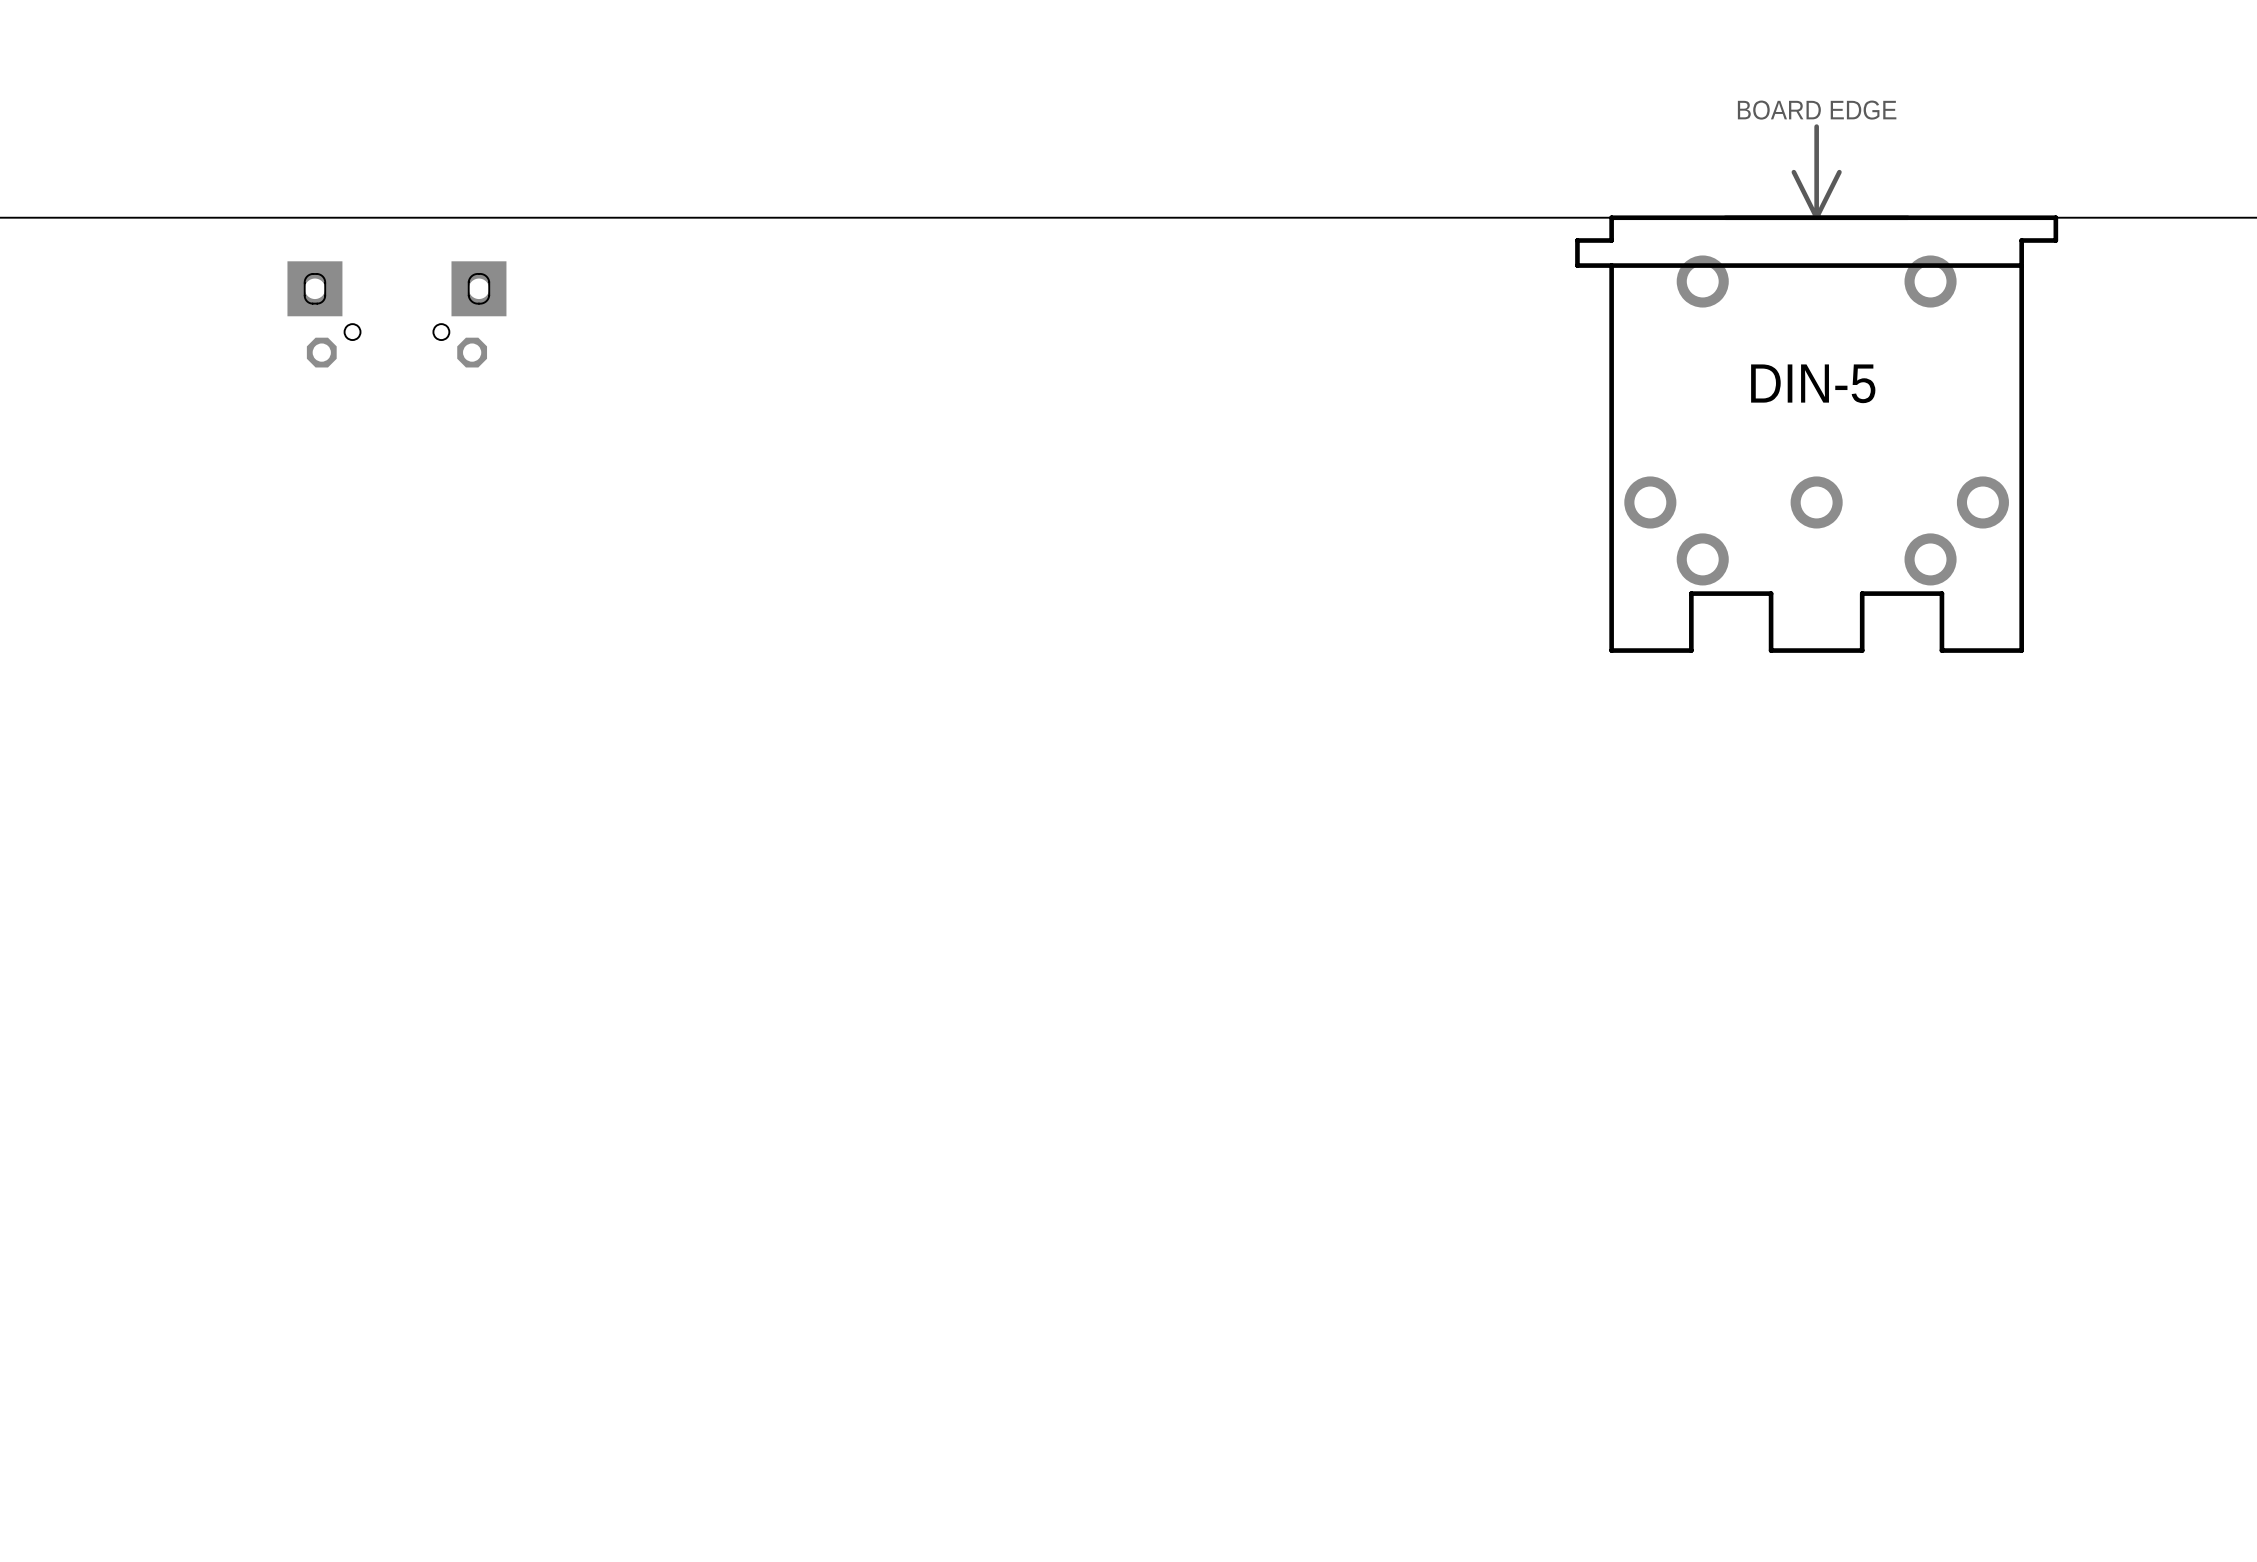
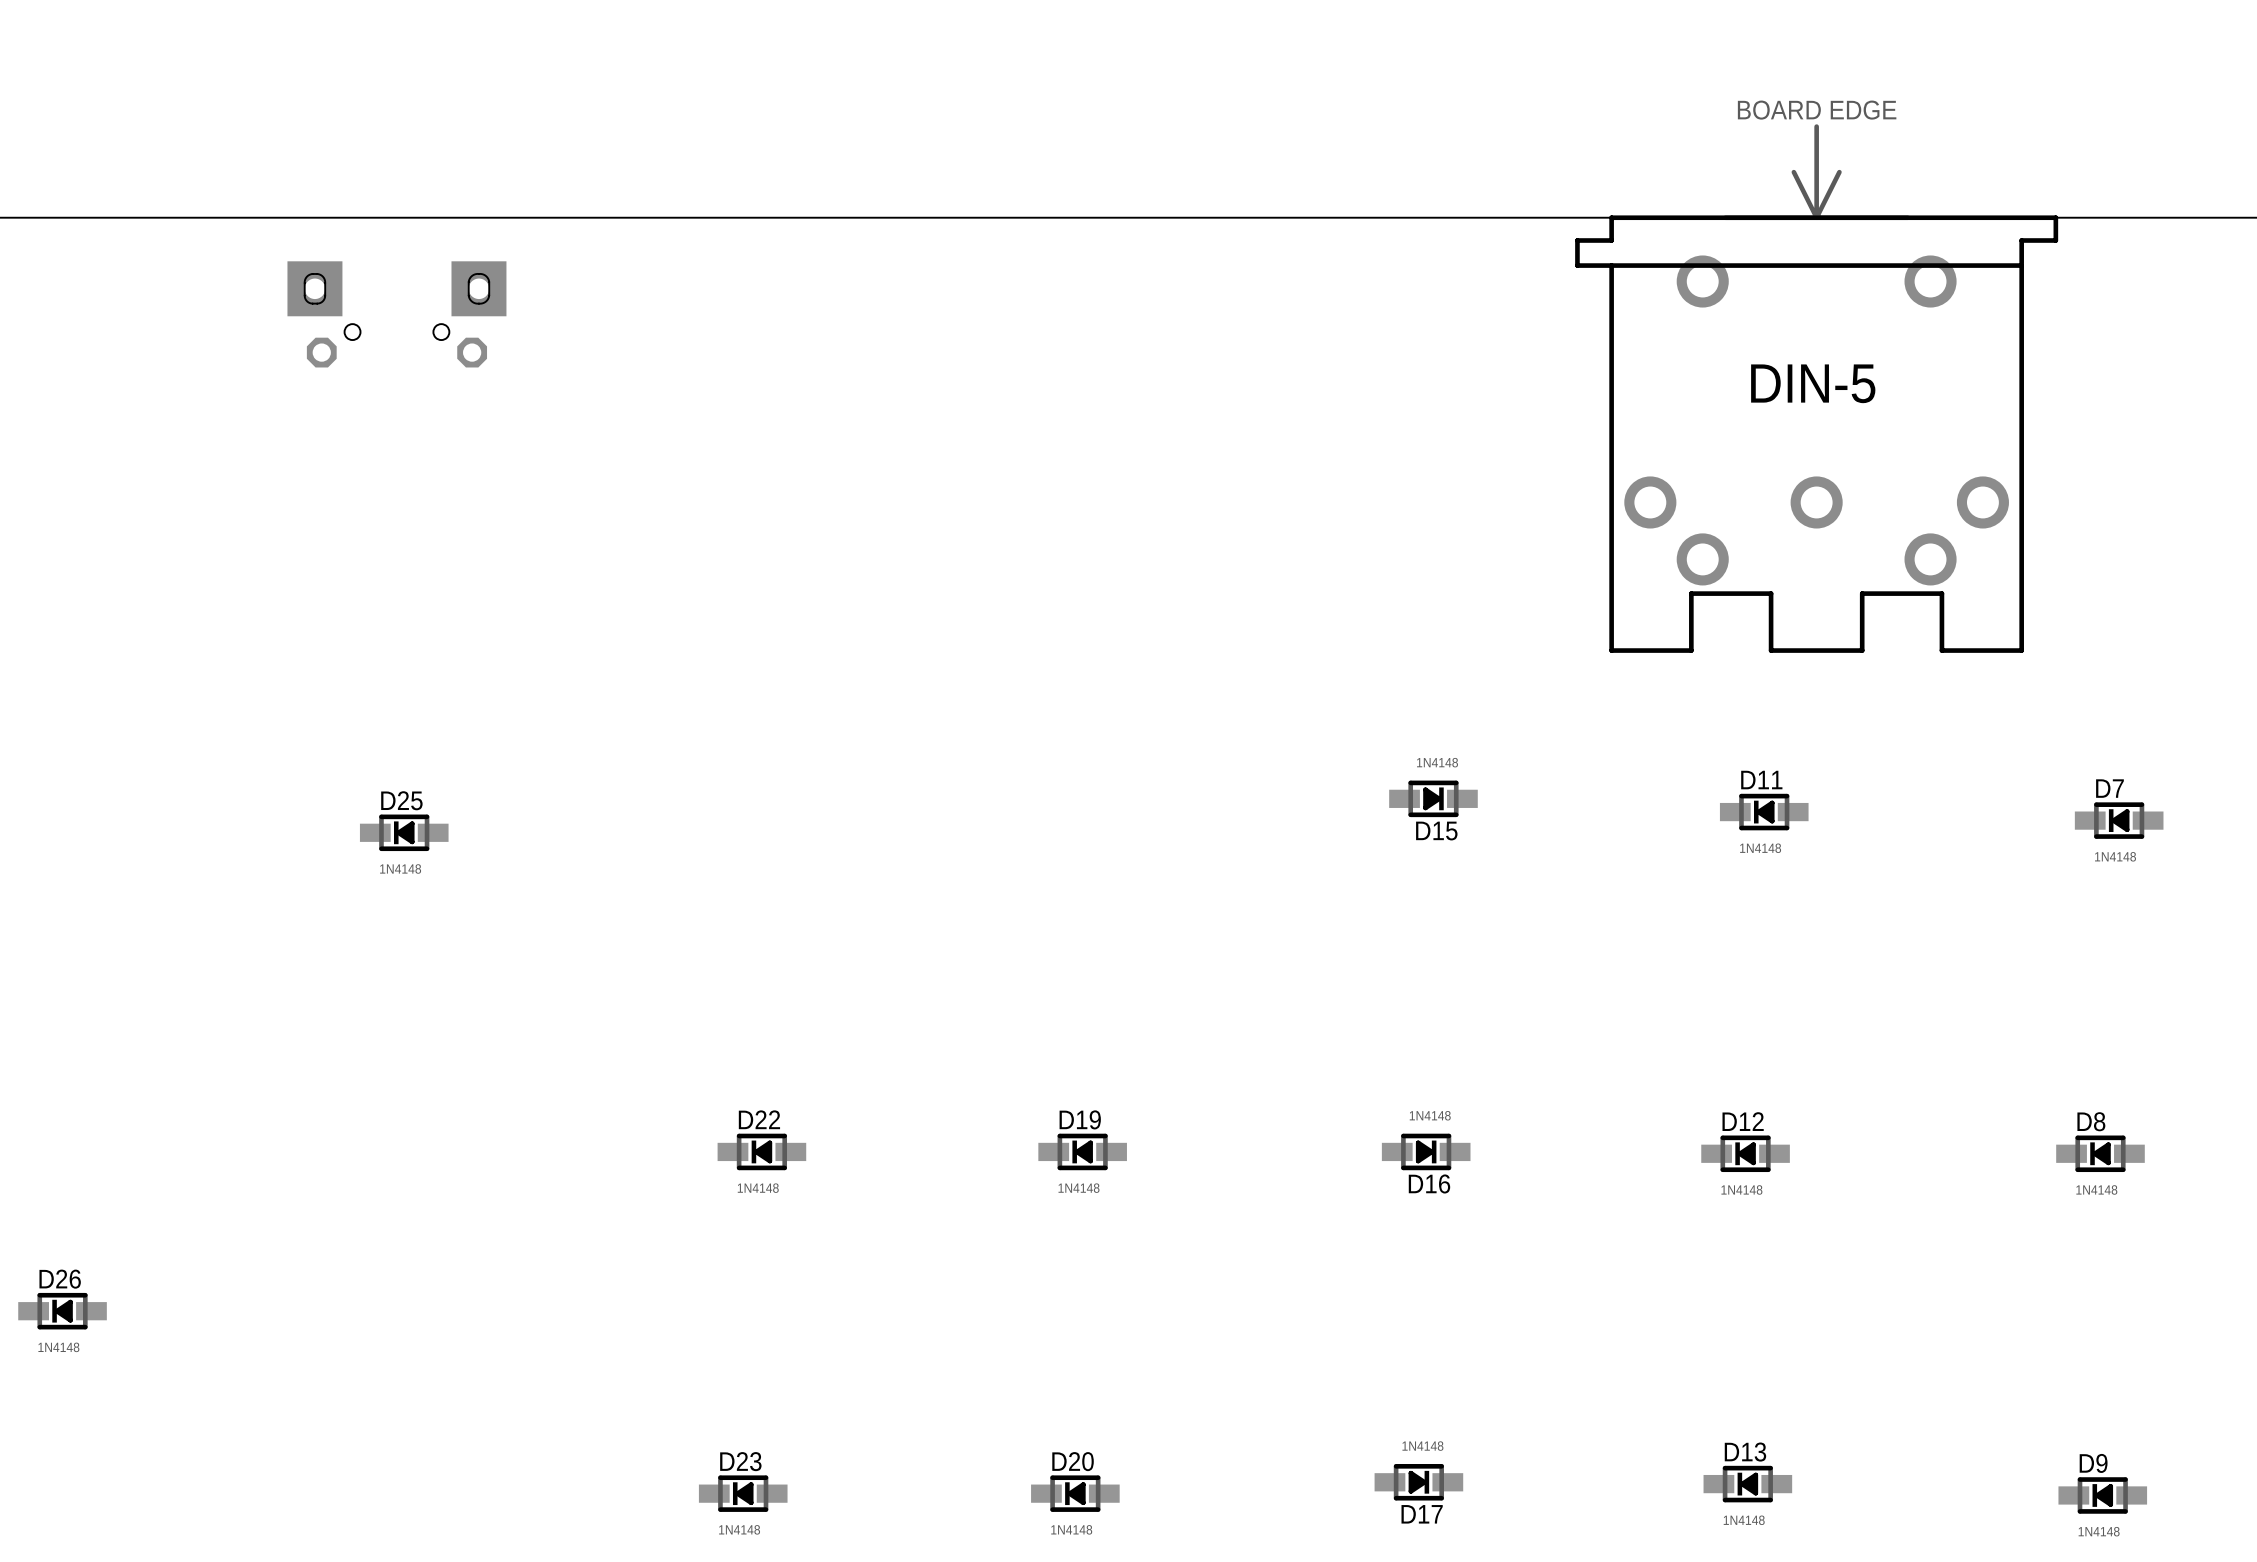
D15: none -> 1N4148 (1433, 798)
D11: none -> 1N4148 (1764, 812)
D7: none -> 1N4148 (2119, 820)
D25: none -> 1N4148 (404, 832)
D22: none -> 1N4148 (761, 1151)
D19: none -> 1N4148 (1082, 1151)
D16: none -> 1N4148 (1426, 1151)
D12: none -> 1N4148 (1745, 1153)
D8: none -> 1N4148 (2100, 1153)
D26: none -> 1N4148 (62, 1311)
D17: none -> 1N4148 (1418, 1482)
D13: none -> 1N4148 (1747, 1484)
D23: none -> 1N4148 (743, 1493)
D20: none -> 1N4148 (1075, 1493)
D9: none -> 1N4148 (2102, 1495)

